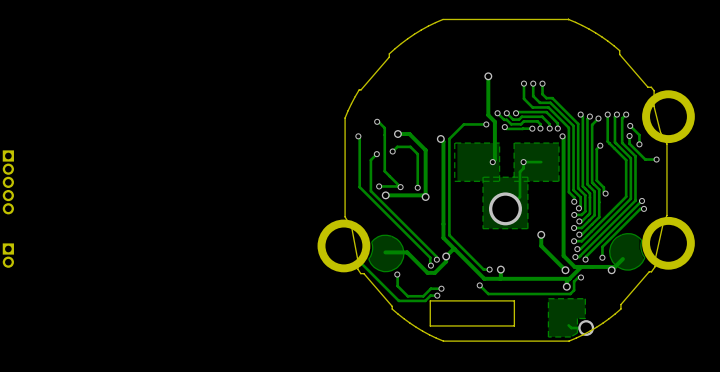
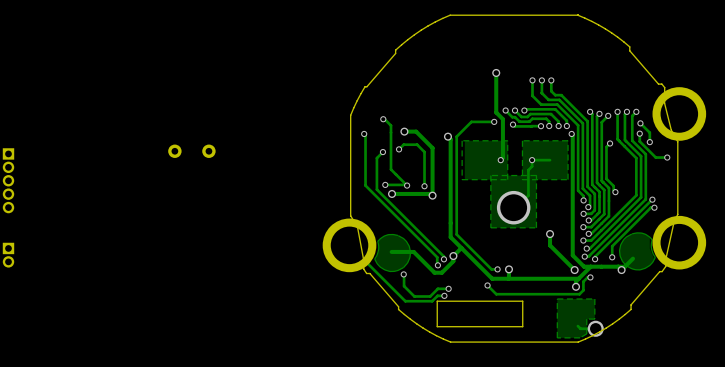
part: none -> (191, 151)

